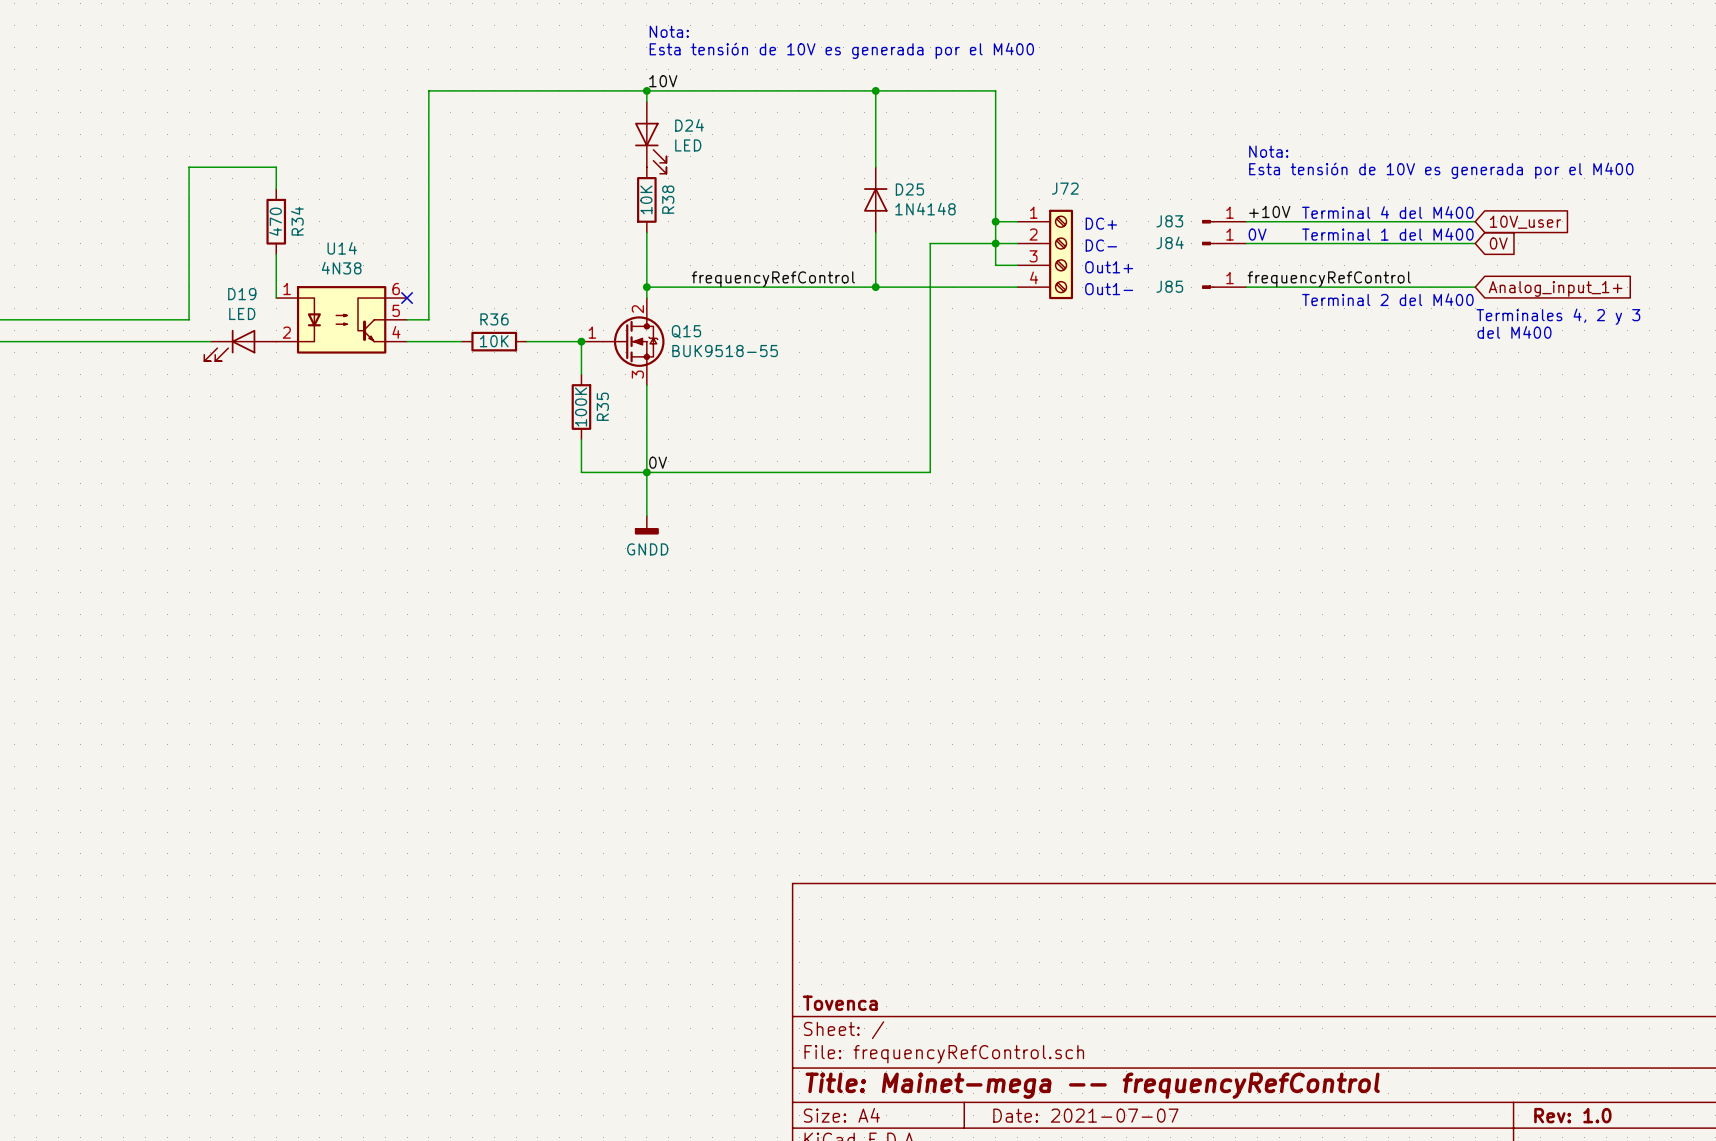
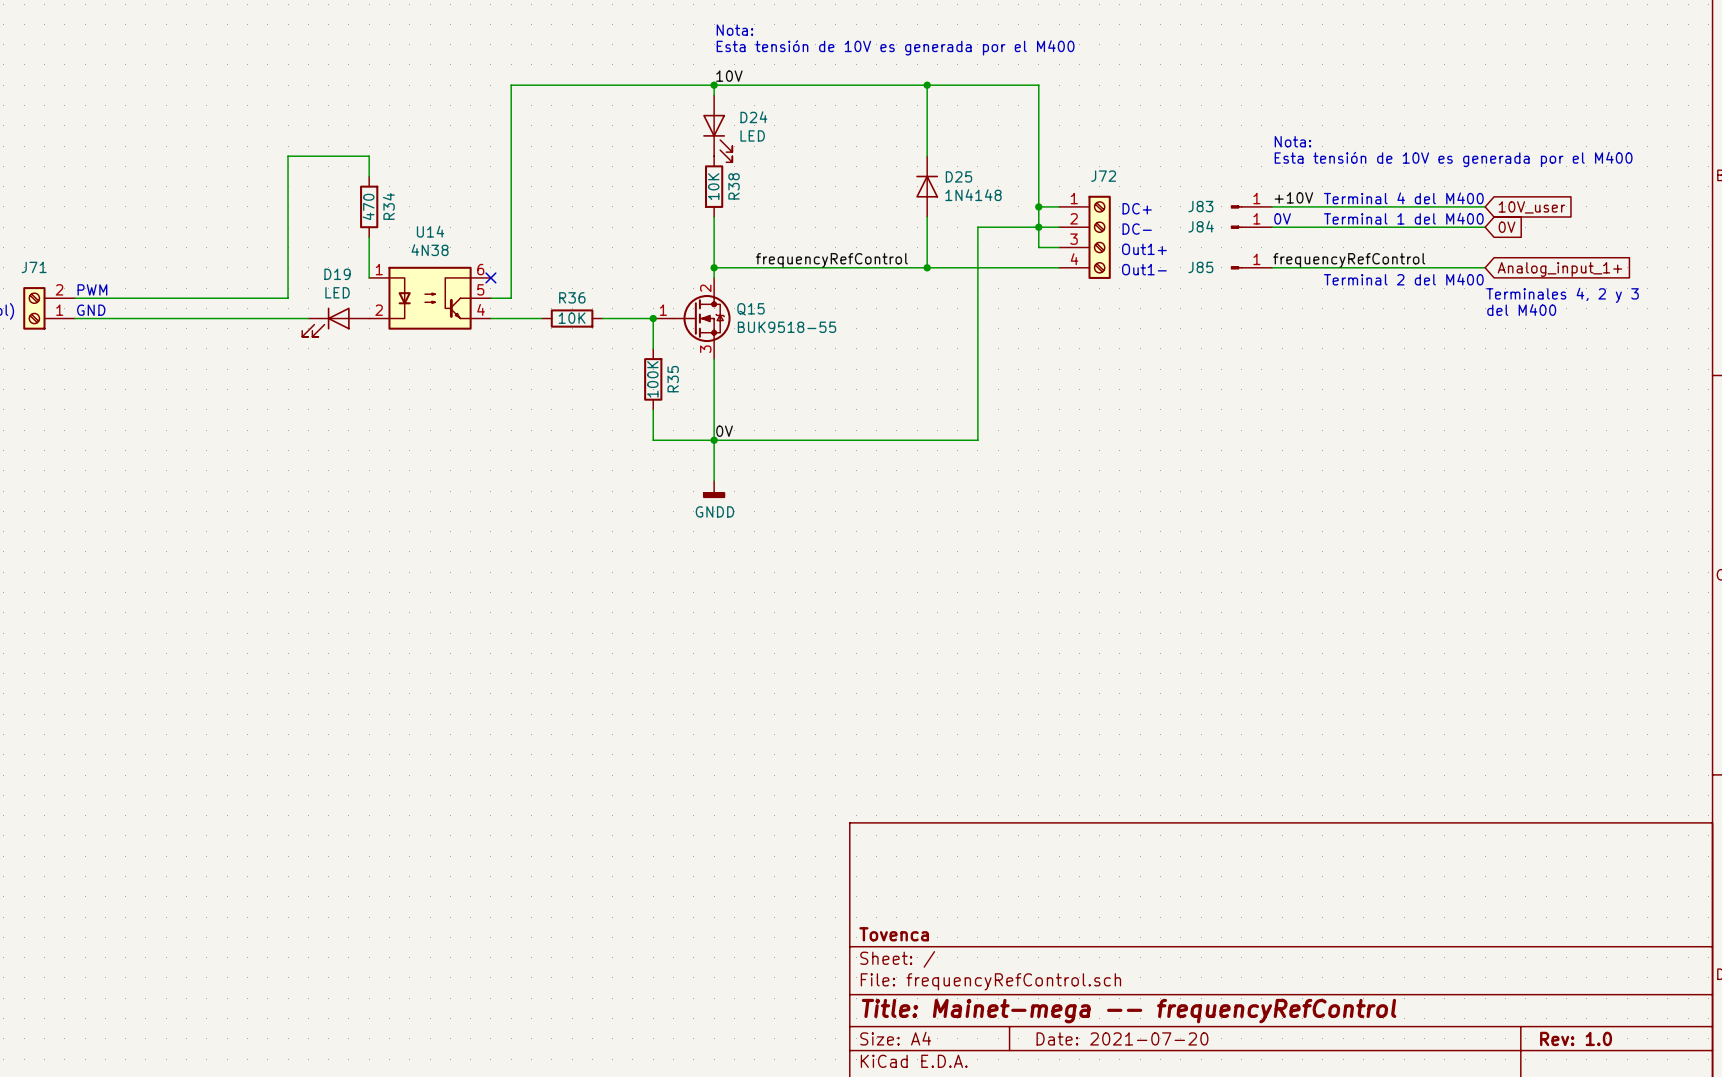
title block: Date: 2021-07-07 (1085, 1115) -> Date: 2021-07-20 (1122, 1038)

